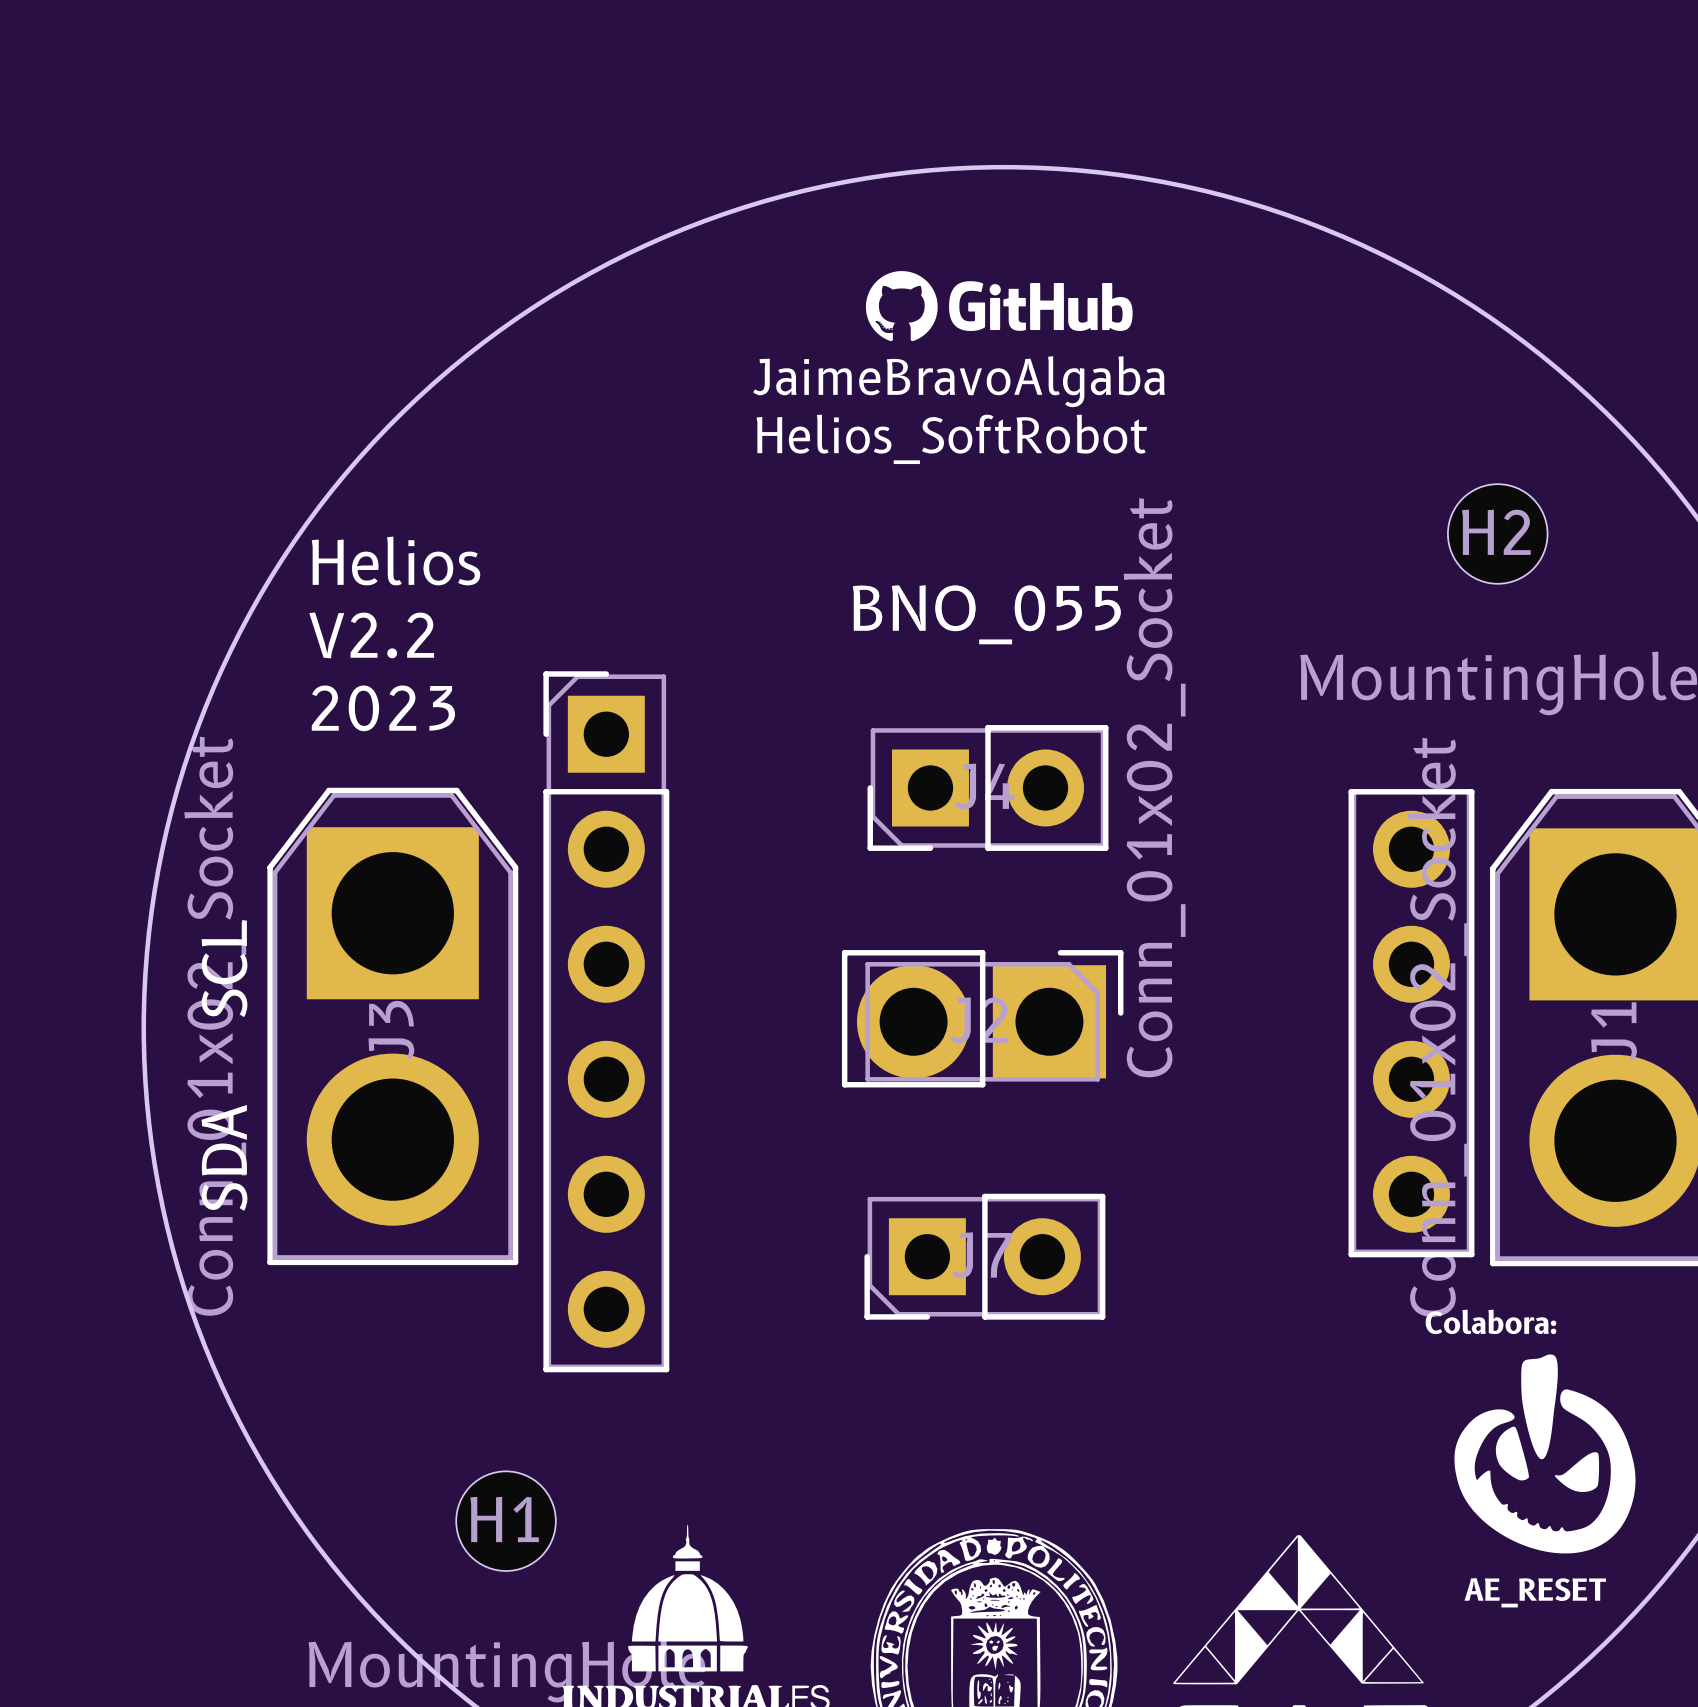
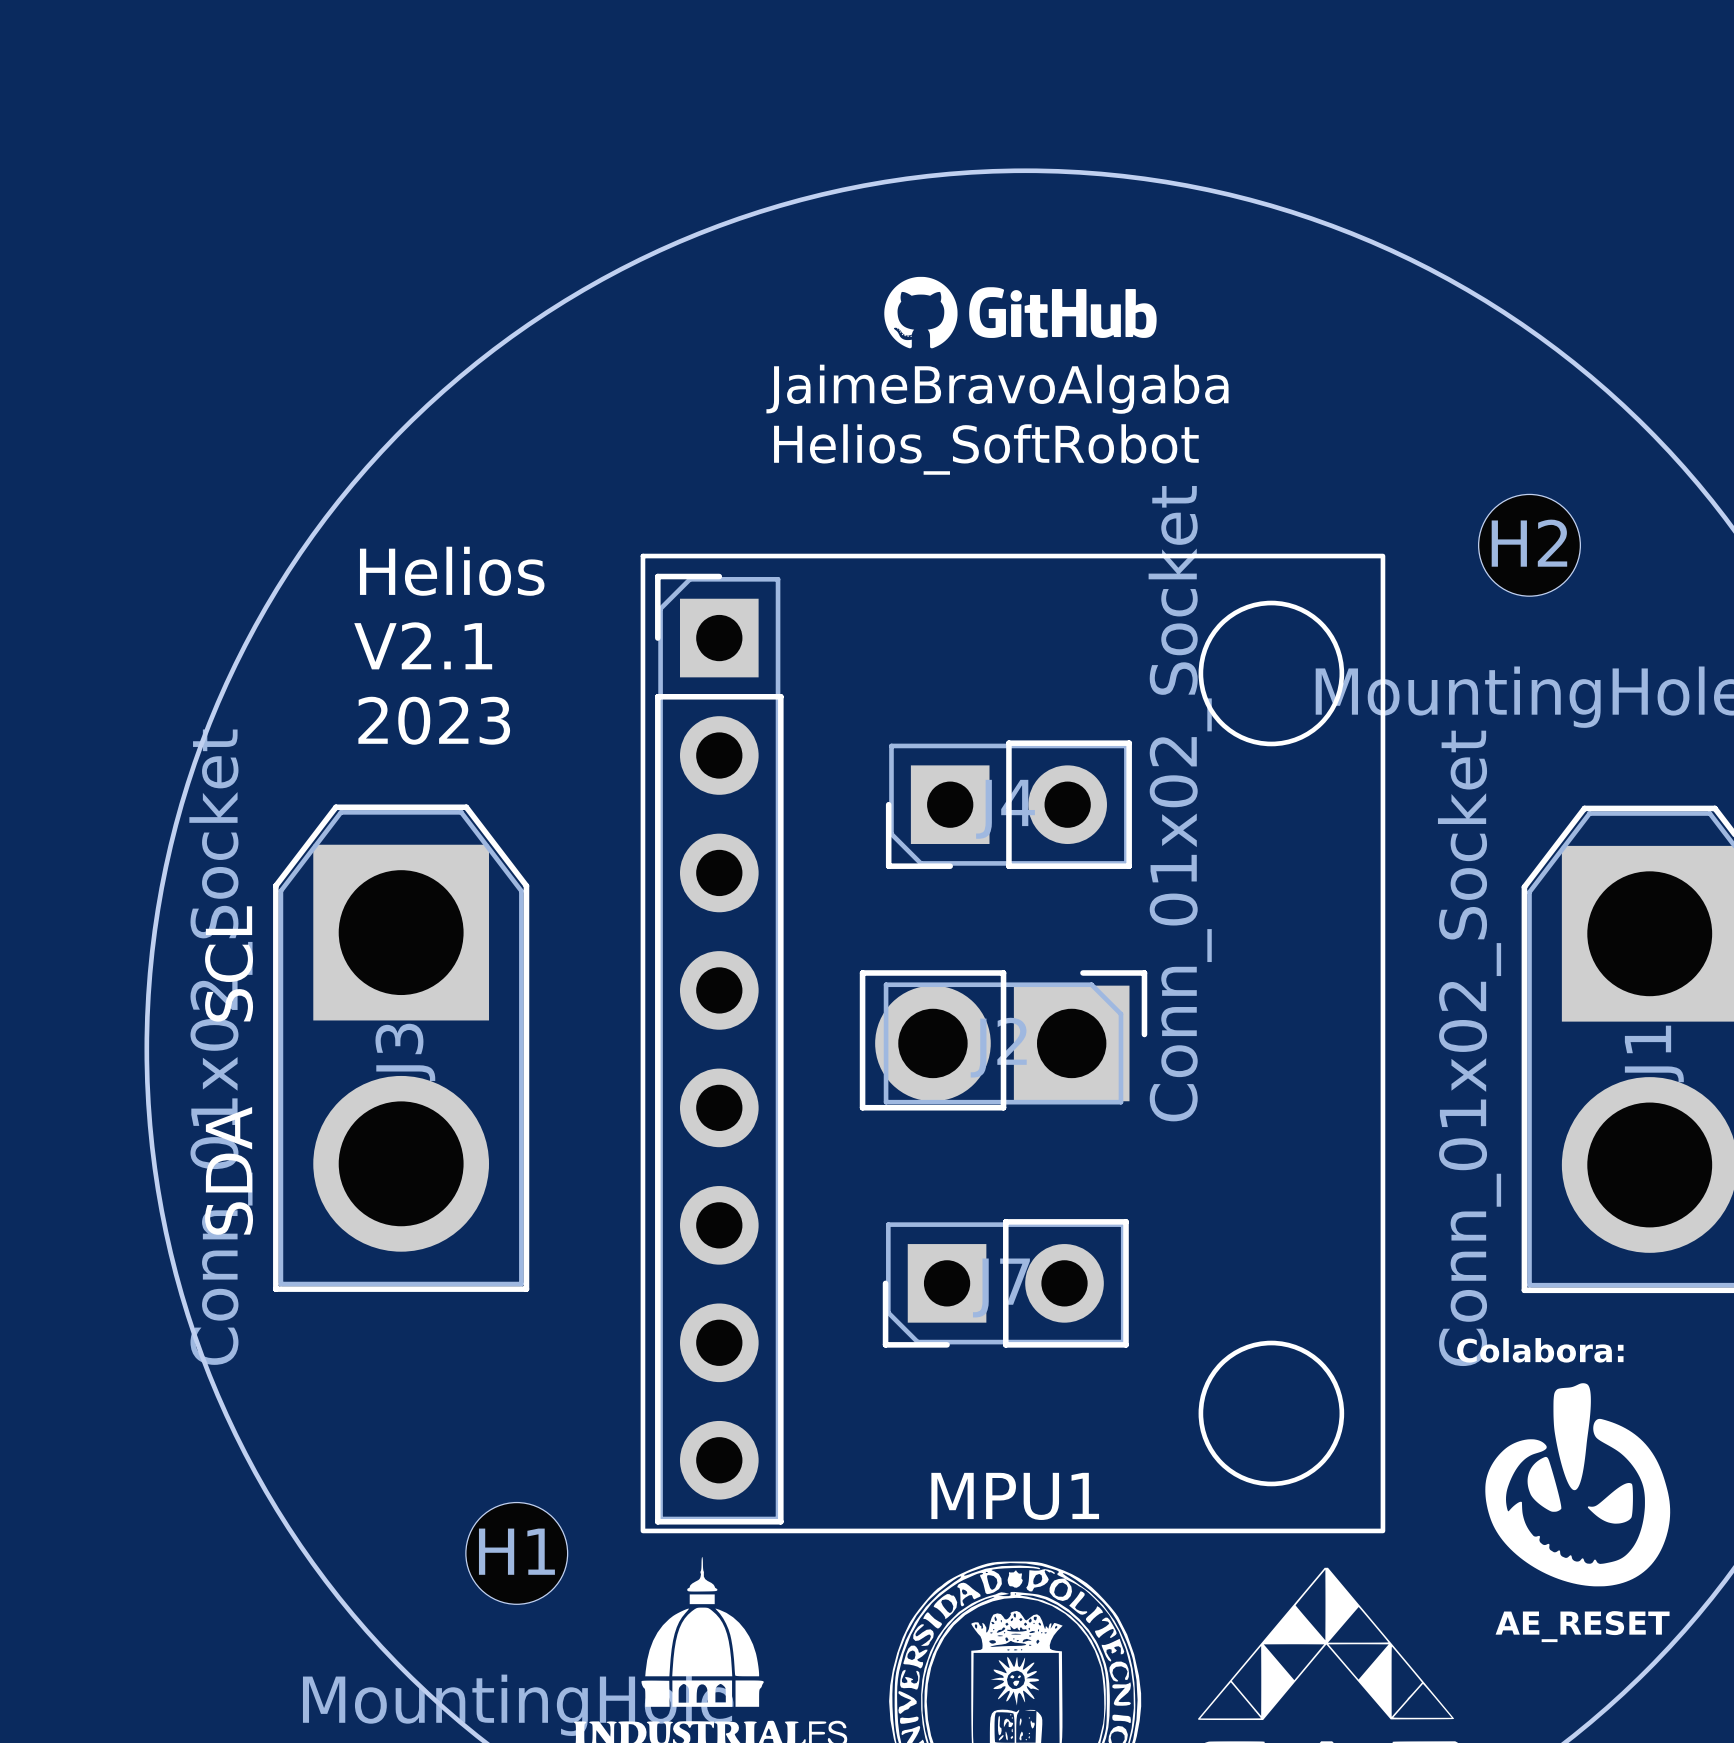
text position: Helios (396, 560) -> Helios (452, 571)
text: BNO_055 (986, 614) -> none
text: V2.2 (371, 635) -> V2.1 (423, 645)
text position: 2023 (383, 708) -> 2023 (434, 720)
MPU1: none -> (1012, 1043)
part: (1008, 1021) -> none

